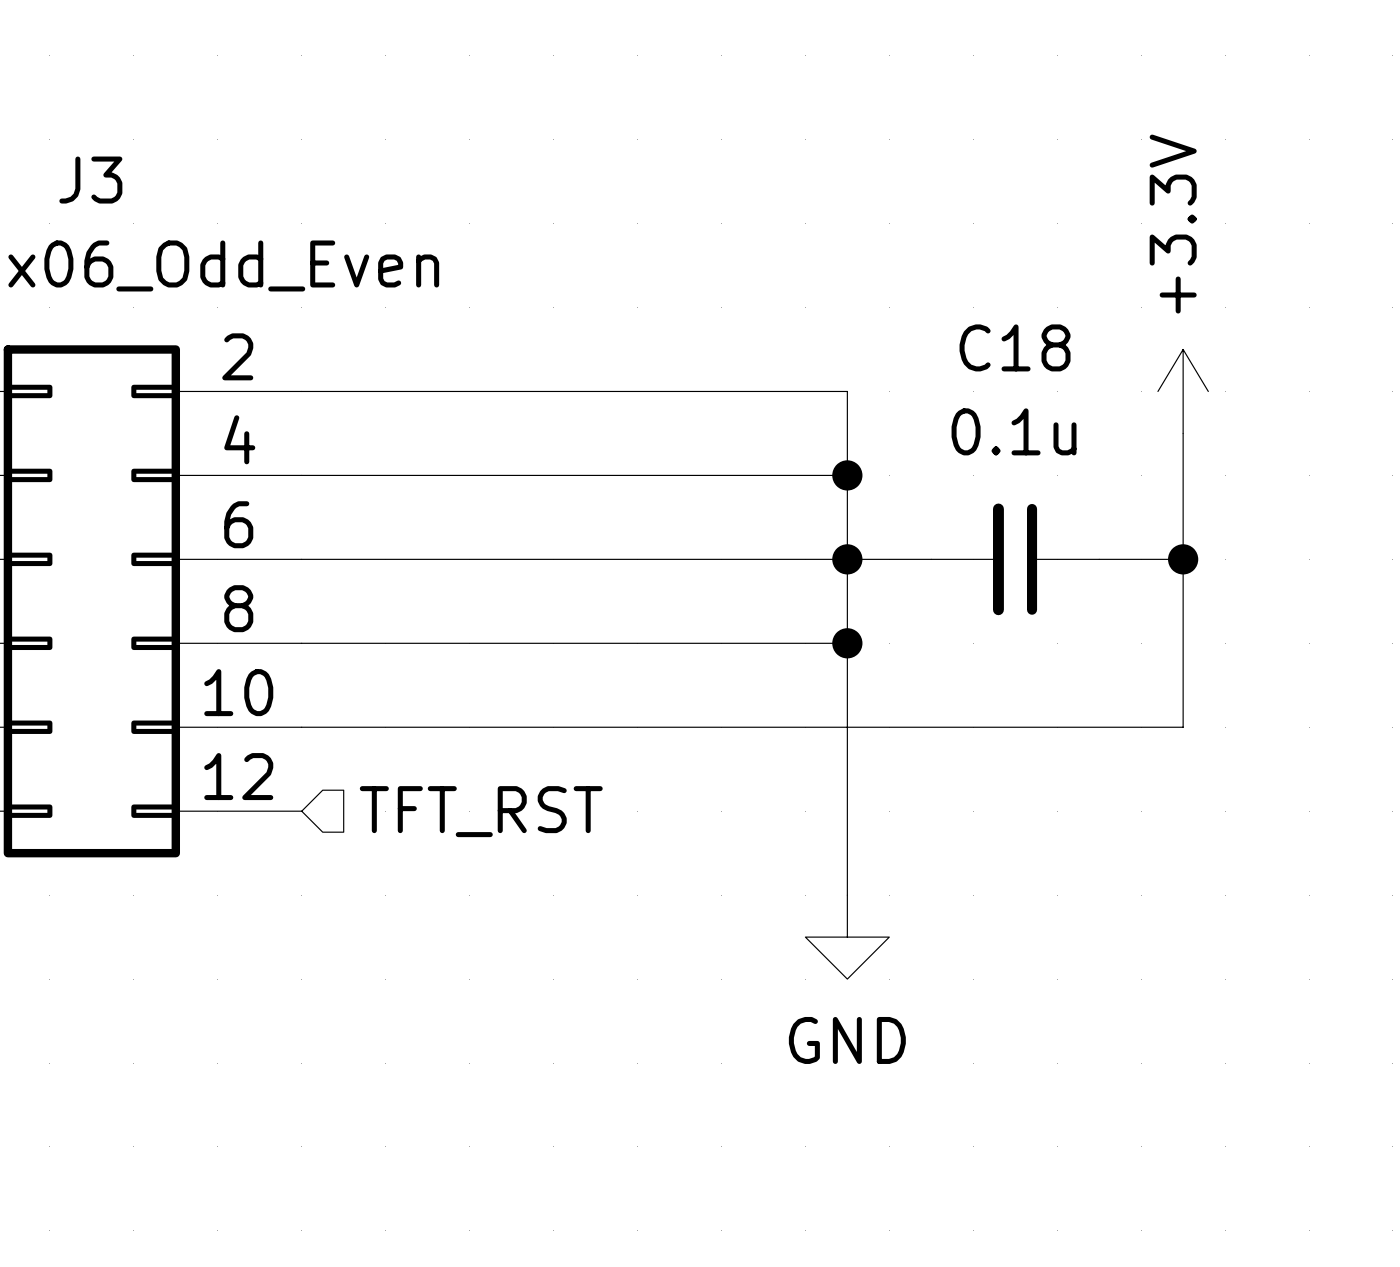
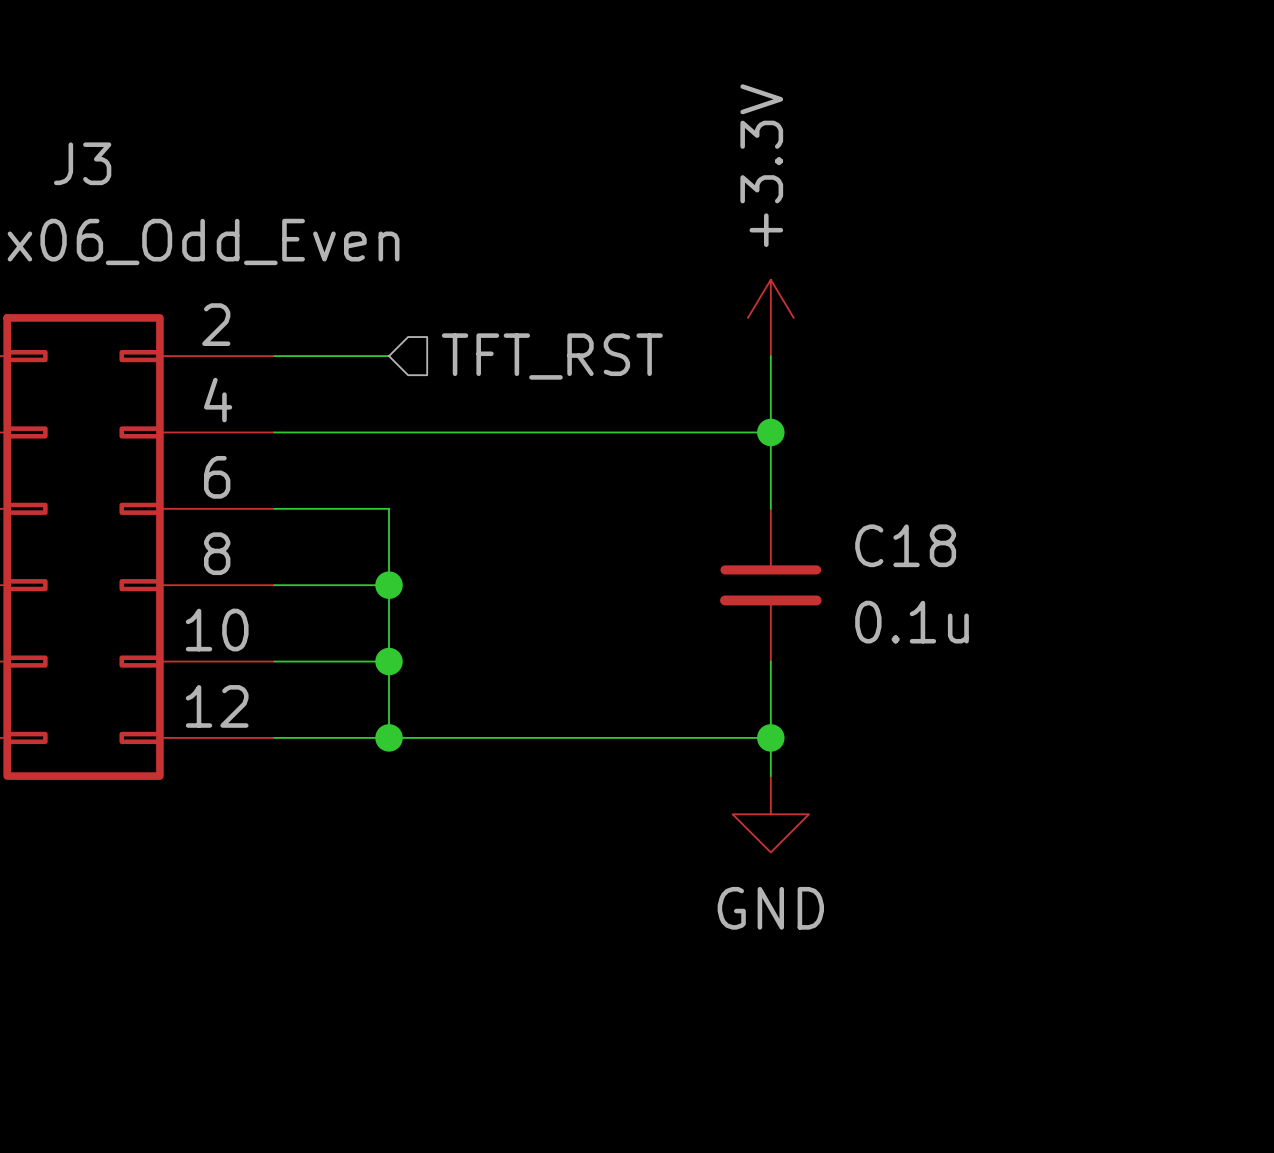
C18 name position: C18 (1015, 347) -> C18 (905, 545)
wire: (427, 391) (847, 391) -> none
power symbol position: +3.3V (1183, 391) -> +3.3V (770, 317)
C18 value position: 0.1u (1014, 431) -> 0.1u (912, 622)
wire: (1183, 433) (1183, 727) (427, 727) -> none
wire: (427, 559) (931, 559) -> (389, 508) (389, 737)
junction: (847, 559) -> none
C18 rotation: 0° (1015, 559) -> 90° counterclockwise (770, 585)
C18 position: (1015, 559) -> (770, 585)
wire: (1099, 559) (1183, 559) -> none
junction: (1183, 559) -> none
wire: (427, 643) (847, 643) -> none
junction: none -> (389, 585)
junction: (847, 643) -> none
junction: none -> (389, 661)
wire: none -> (274, 737) (770, 737)
junction: none -> (389, 737)
hierarchical label position: TFT_RST (481, 811) -> TFT_RST (552, 356)
junction: none -> (770, 737)
power symbol position: GND (847, 937) -> GND (770, 814)

